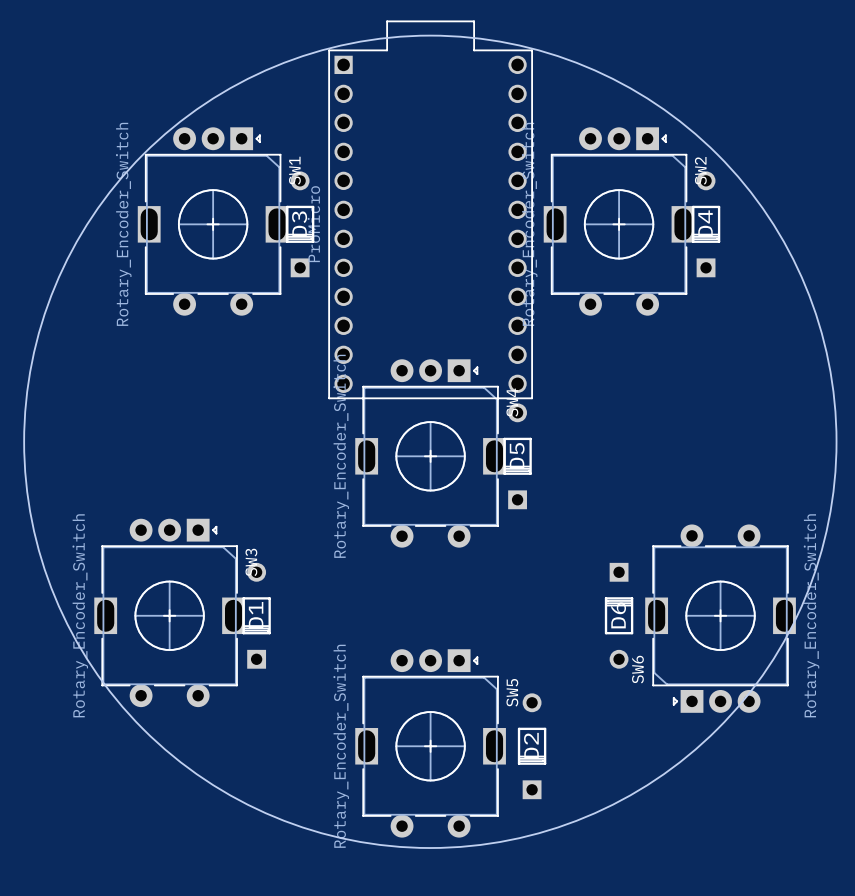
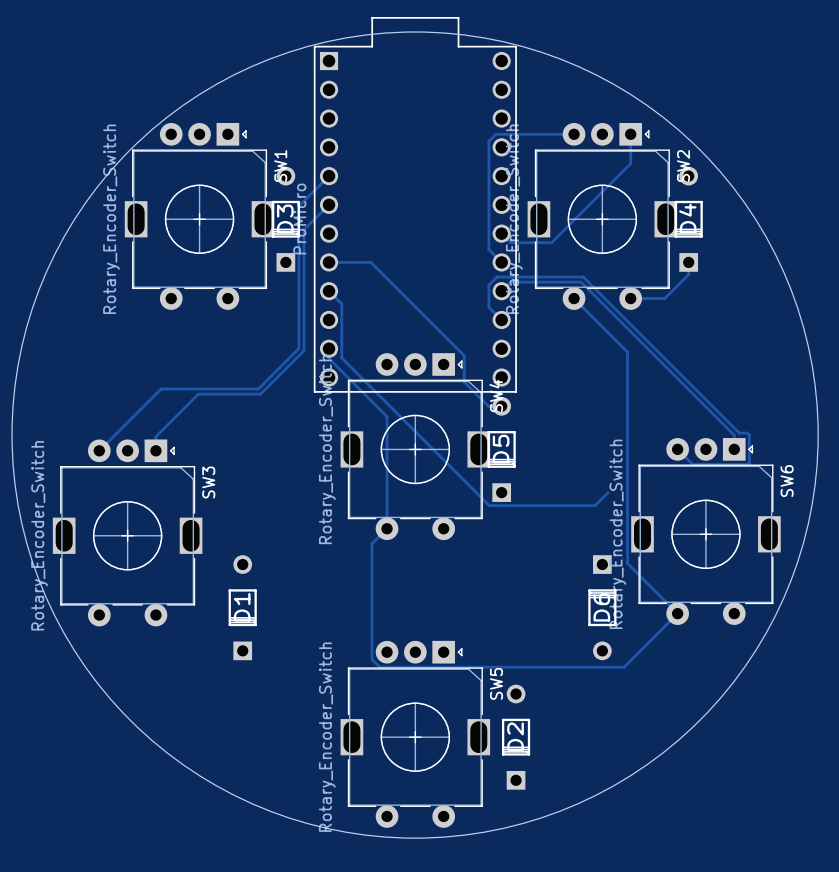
track: none -> (574, 134) (495, 134) (488, 141) (488, 249) (501, 262)
track: none -> (630, 134) (630, 163) (551, 242) (510, 242) (501, 233)
track: none -> (329, 176) (298, 206) (298, 348) (258, 389) (161, 389) (99, 450)
track: none -> (329, 204) (304, 229) (304, 350) (260, 394) (198, 394) (155, 436) (155, 450)
track: none -> (329, 262) (370, 262) (464, 355) (464, 382) (488, 406) (501, 406)
track: none -> (688, 262) (688, 274) (664, 298) (630, 298)
track: none -> (329, 291) (341, 303) (341, 358) (489, 505) (595, 505) (608, 492)
track: none -> (501, 291) (510, 282) (581, 282) (734, 435) (734, 449)
track: none -> (574, 298) (627, 352) (627, 563) (677, 613) (624, 667) (379, 667) (372, 659) (372, 543) (387, 528) (387, 416) (329, 358) (329, 348)
track: none -> (501, 319) (488, 307) (488, 285) (496, 277) (583, 277) (739, 433) (747, 433) (749, 435) (748, 464) (692, 464) (677, 449)
SW3 position: (169, 612) -> (127, 532)
SW6 rotation: 0° (720, 618) -> 180° (705, 531)

